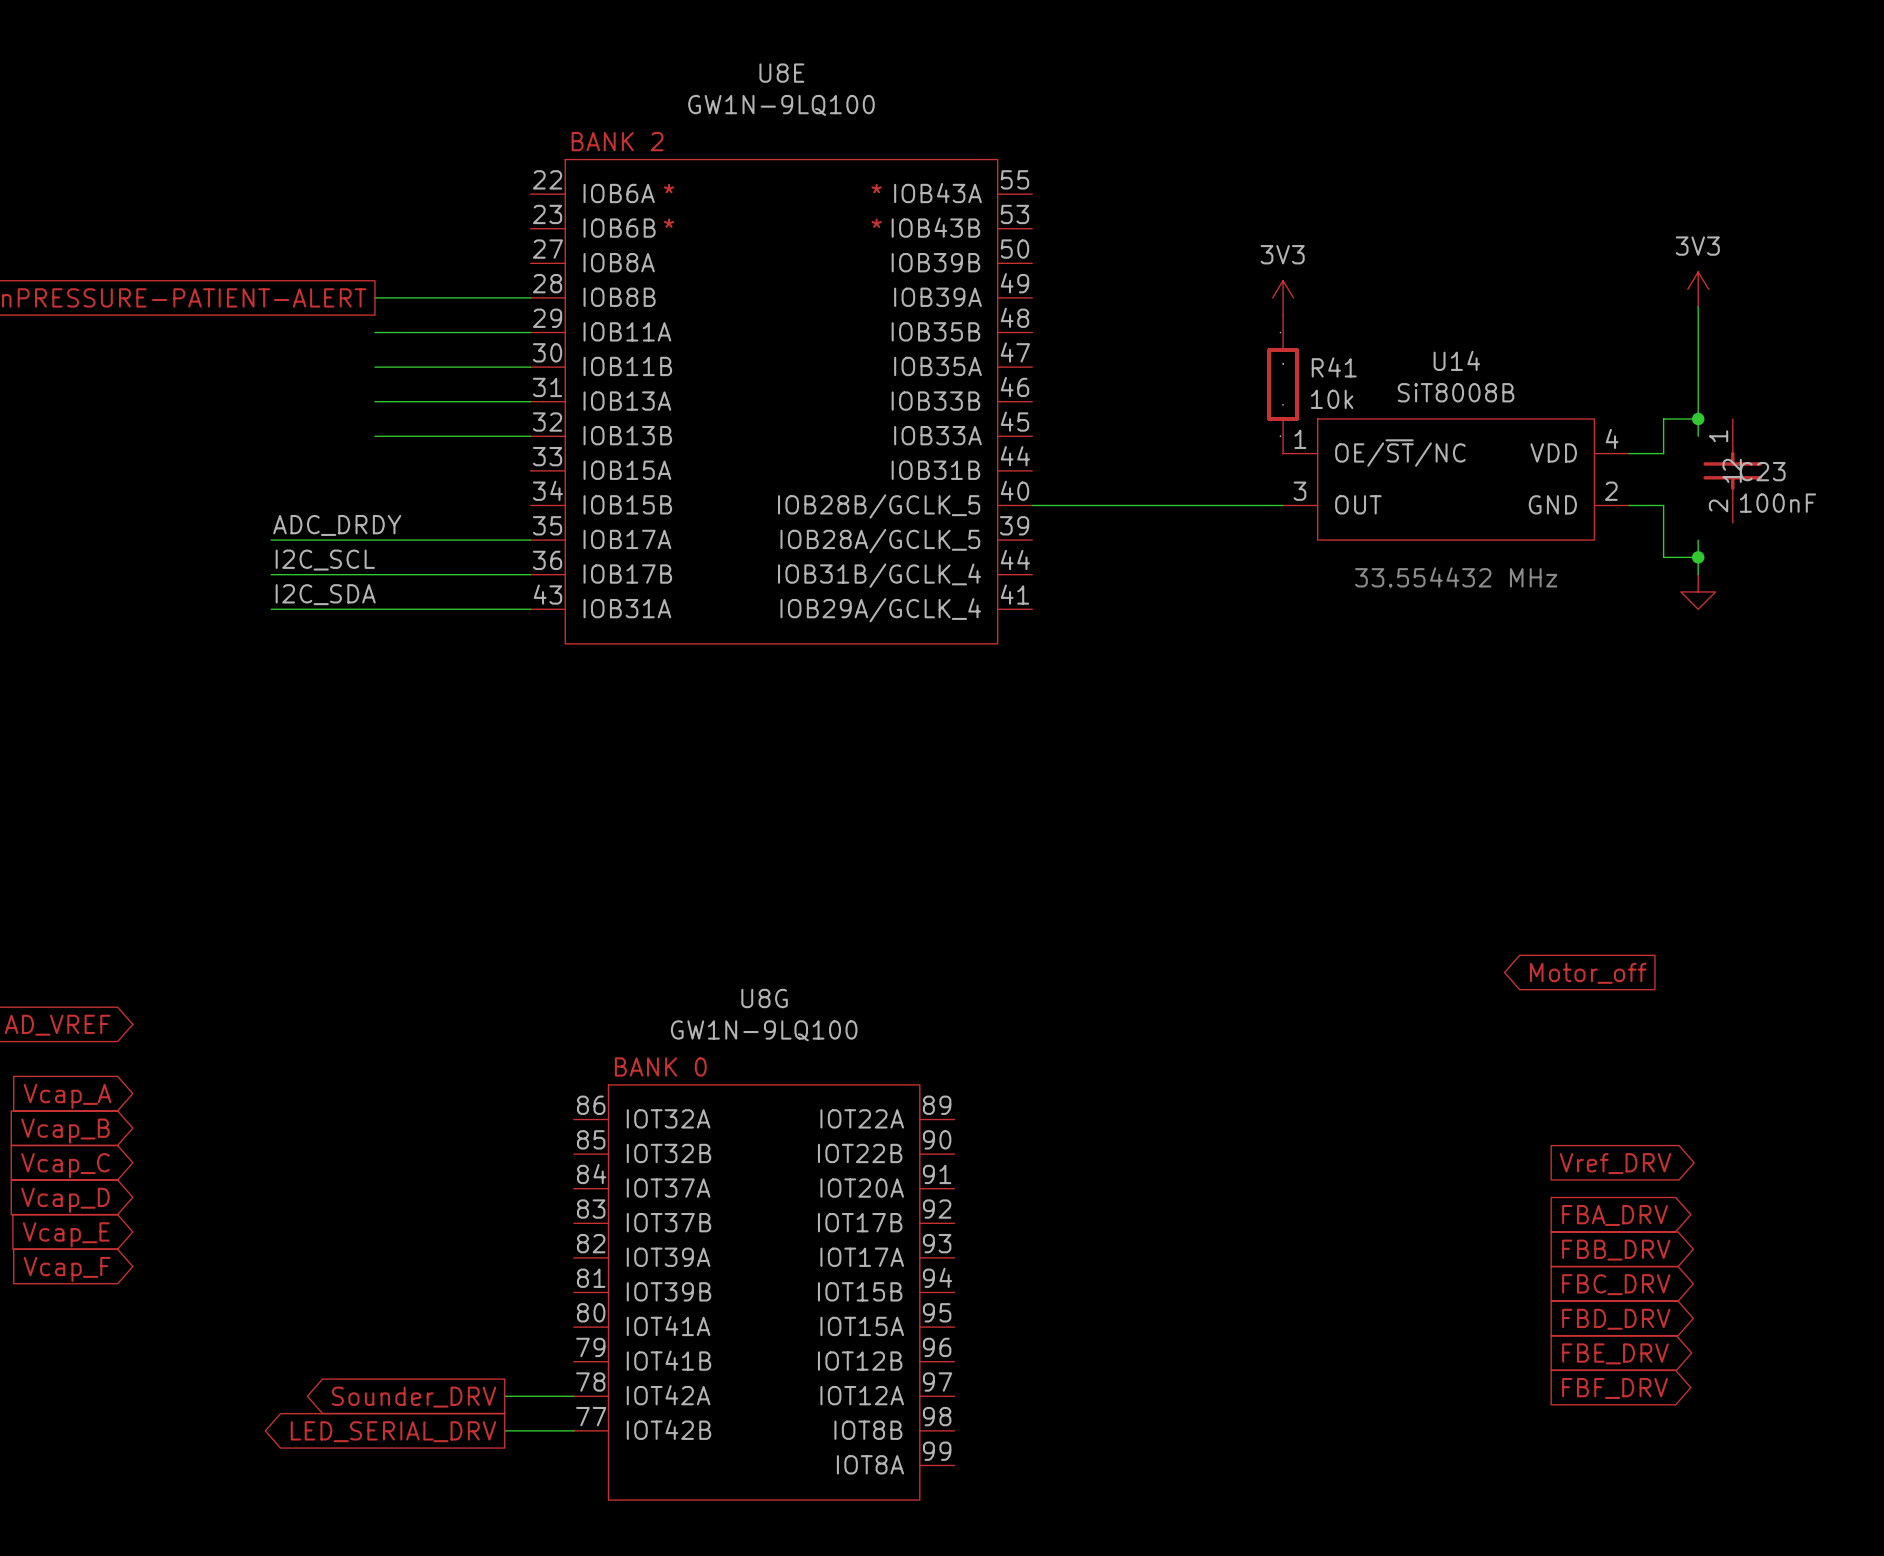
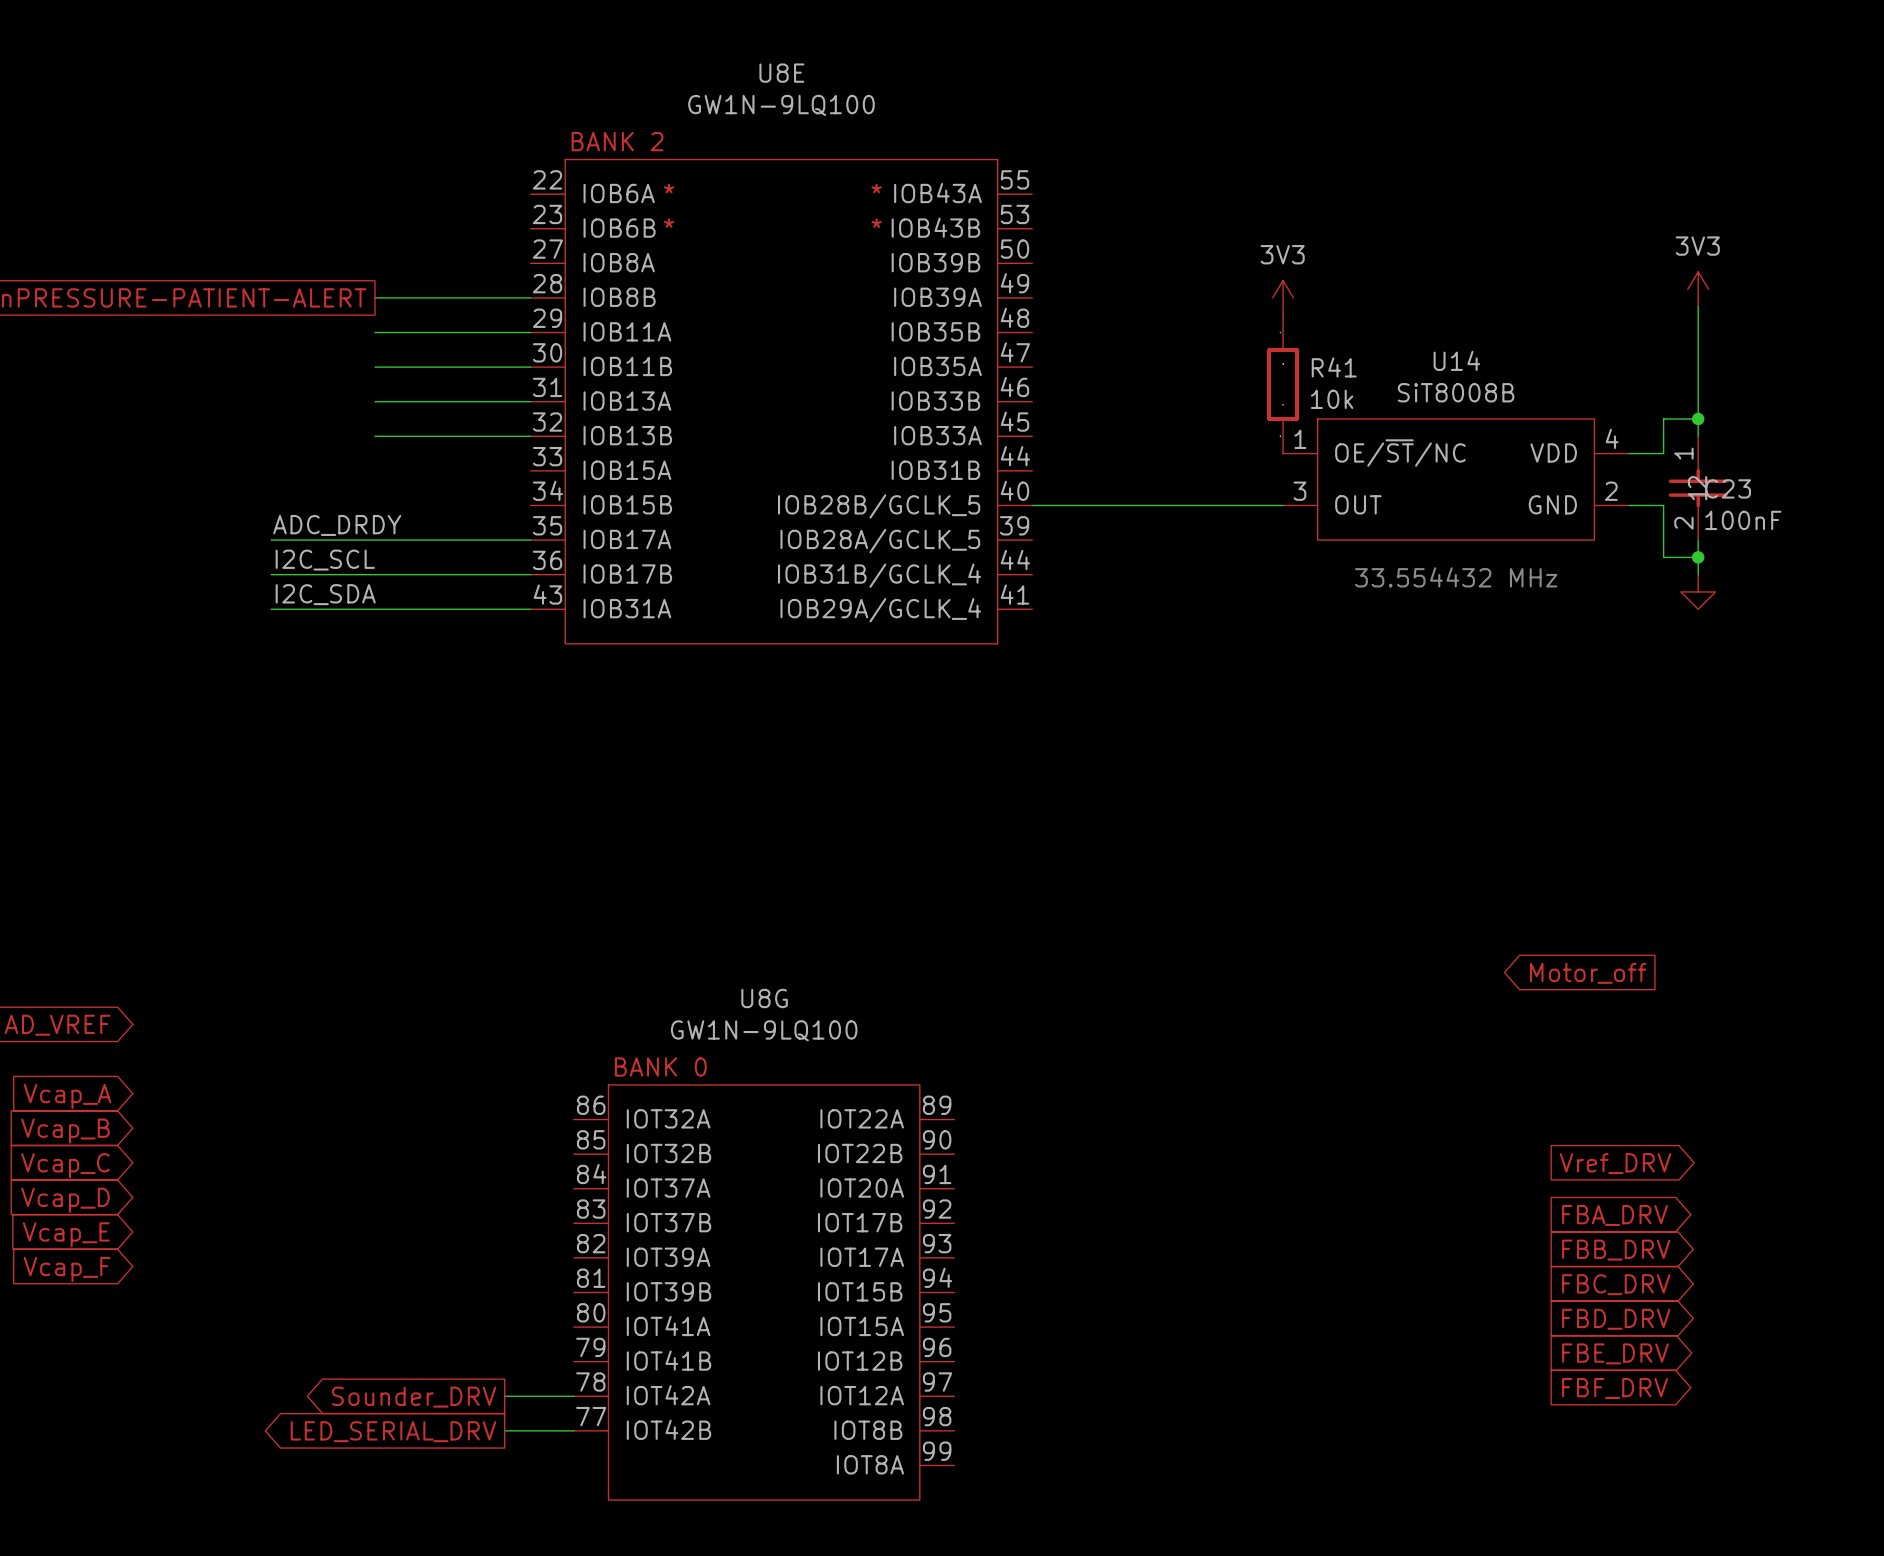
C23 position: (1732, 470) -> (1698, 488)

